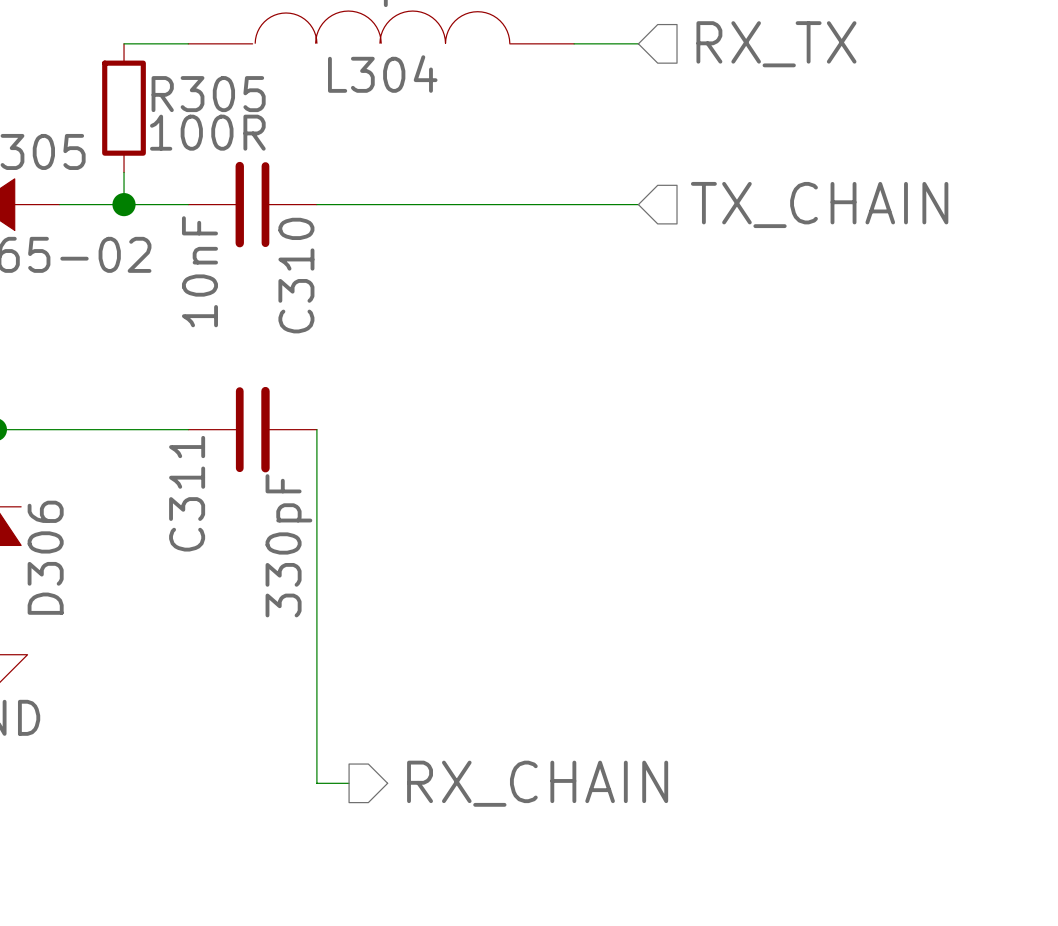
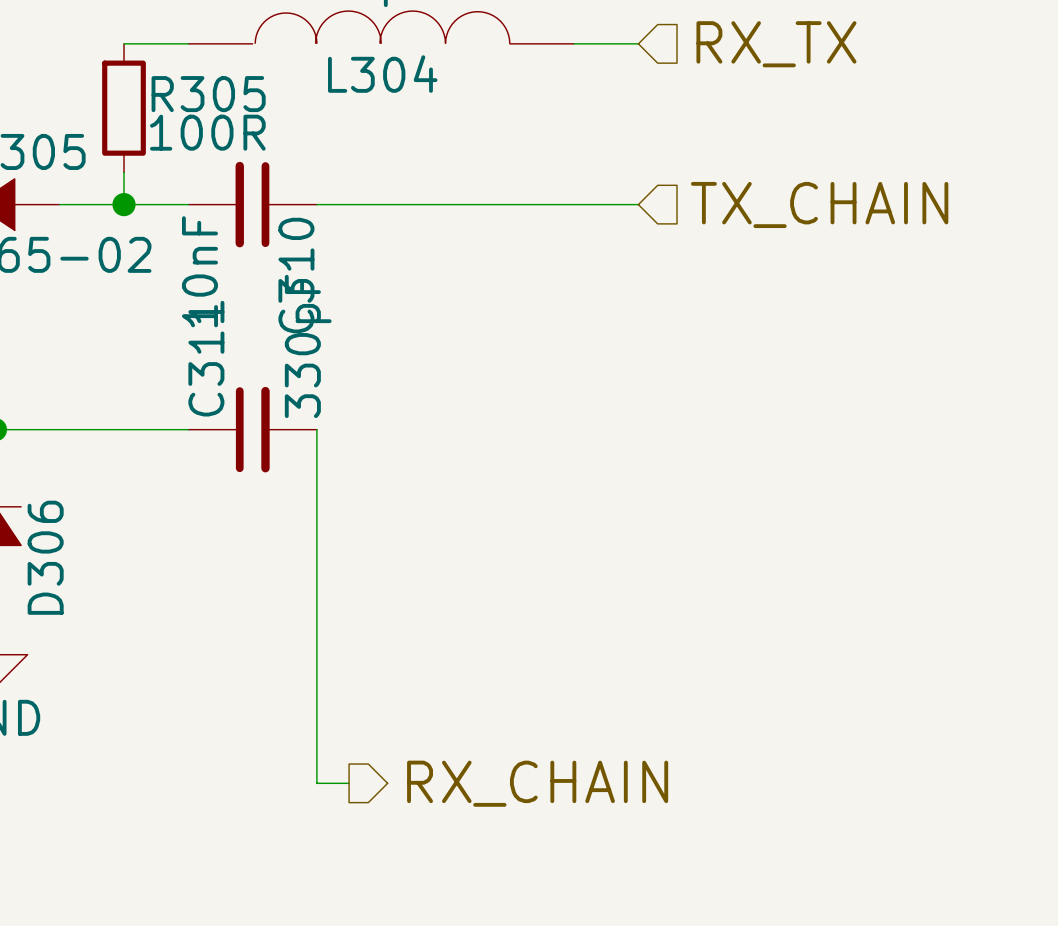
C311 name position: C311 (187, 493) -> C311 (206, 358)
C311 value position: 330pF (288, 545) -> 330pF (308, 346)

